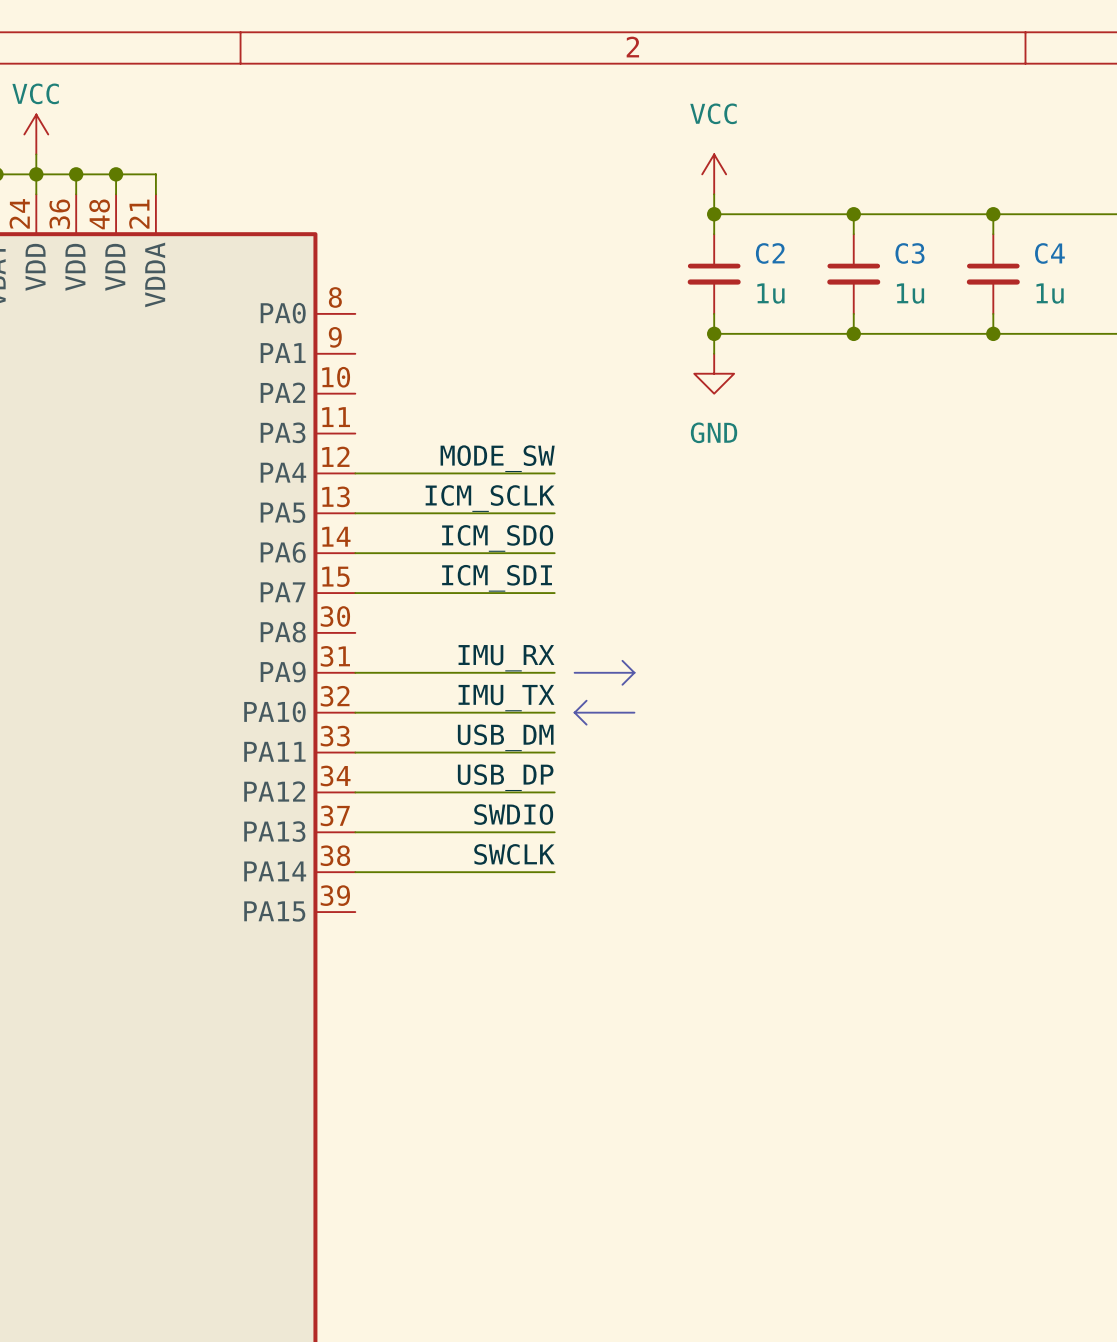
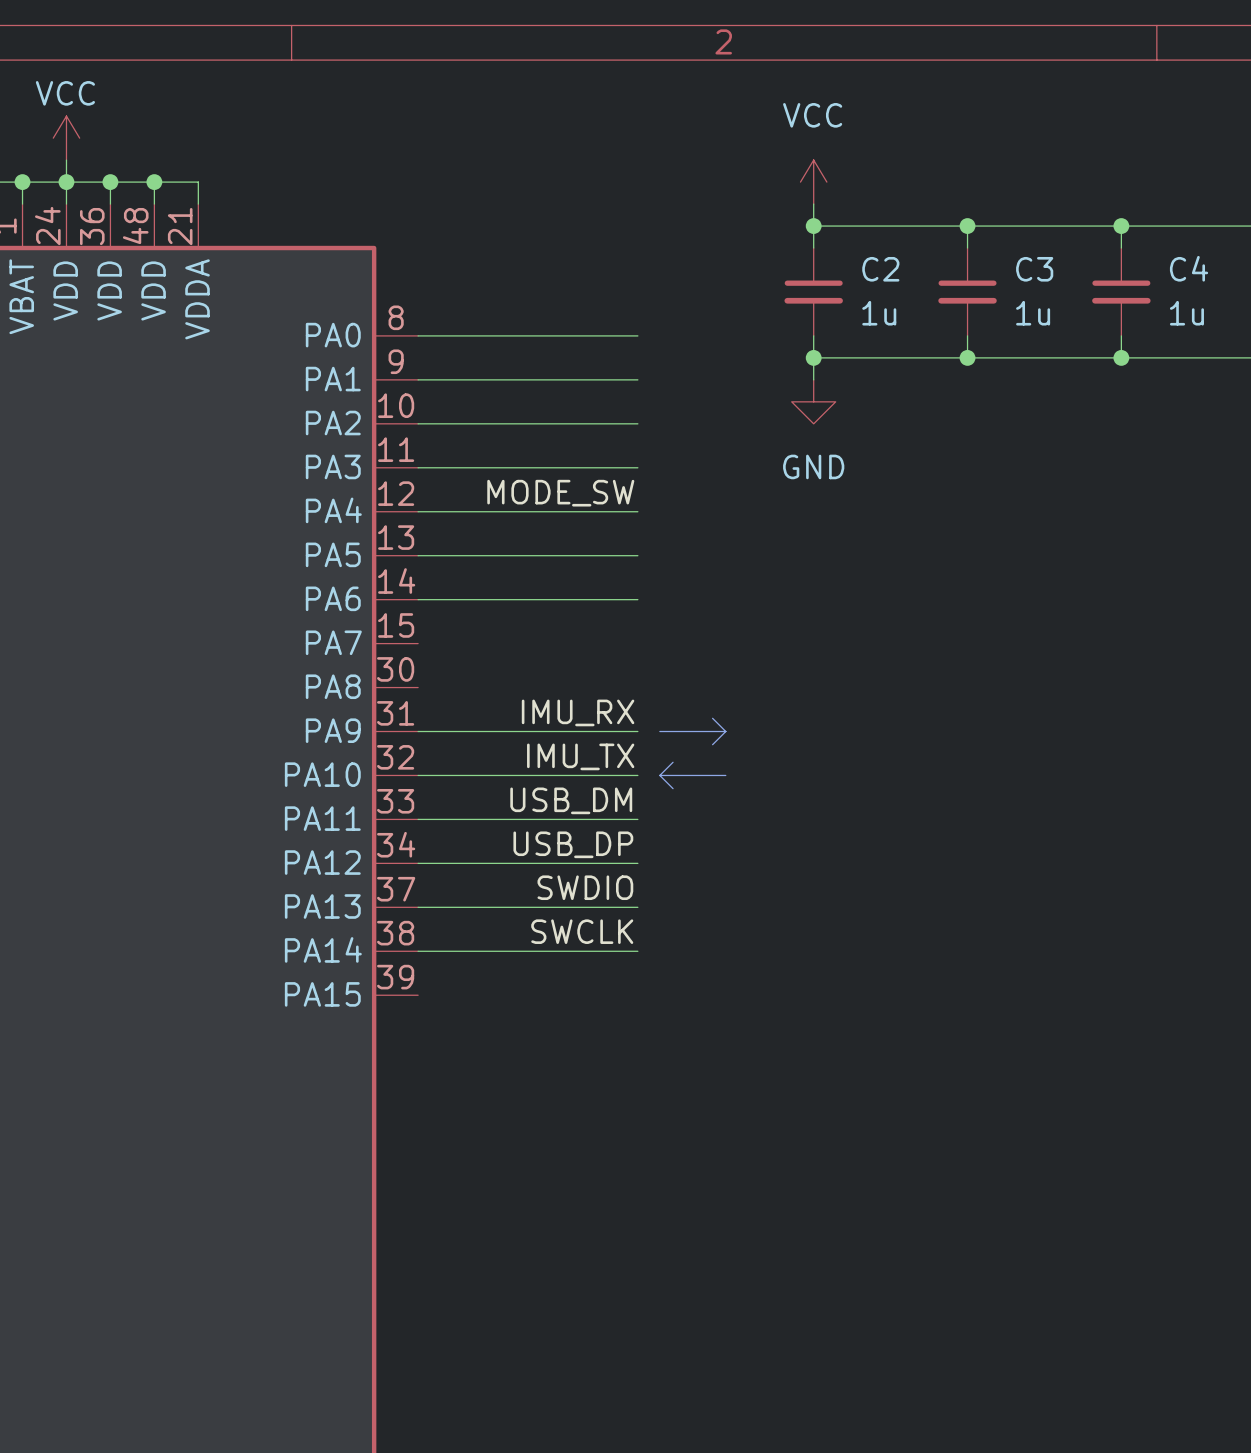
wire: none -> (418, 335) (637, 335)
wire: none -> (418, 379) (637, 379)
wire: none -> (418, 423) (637, 423)
label: ICM_SCLK (490, 498) -> none
label: ICM_SDO (497, 538) -> none
label: ICM_SDI (497, 578) -> none
wire: (355, 593) (554, 593) -> (418, 467) (637, 467)

